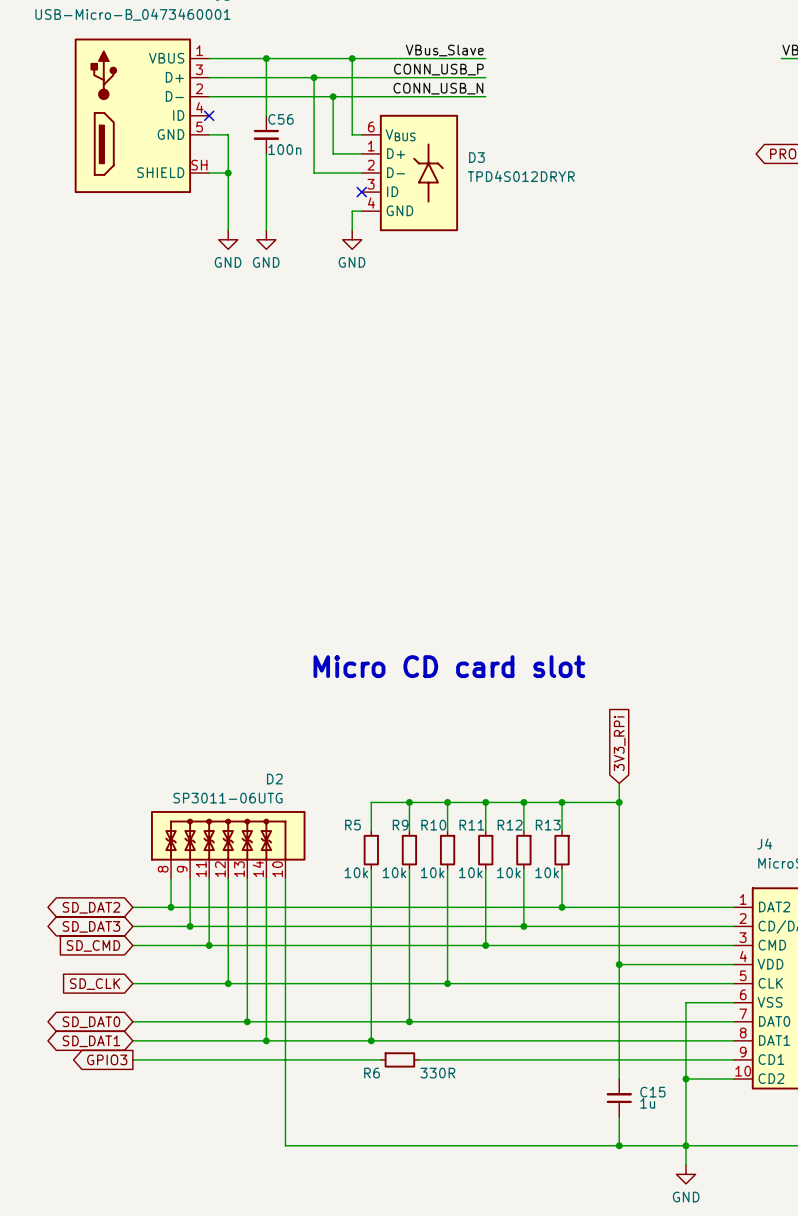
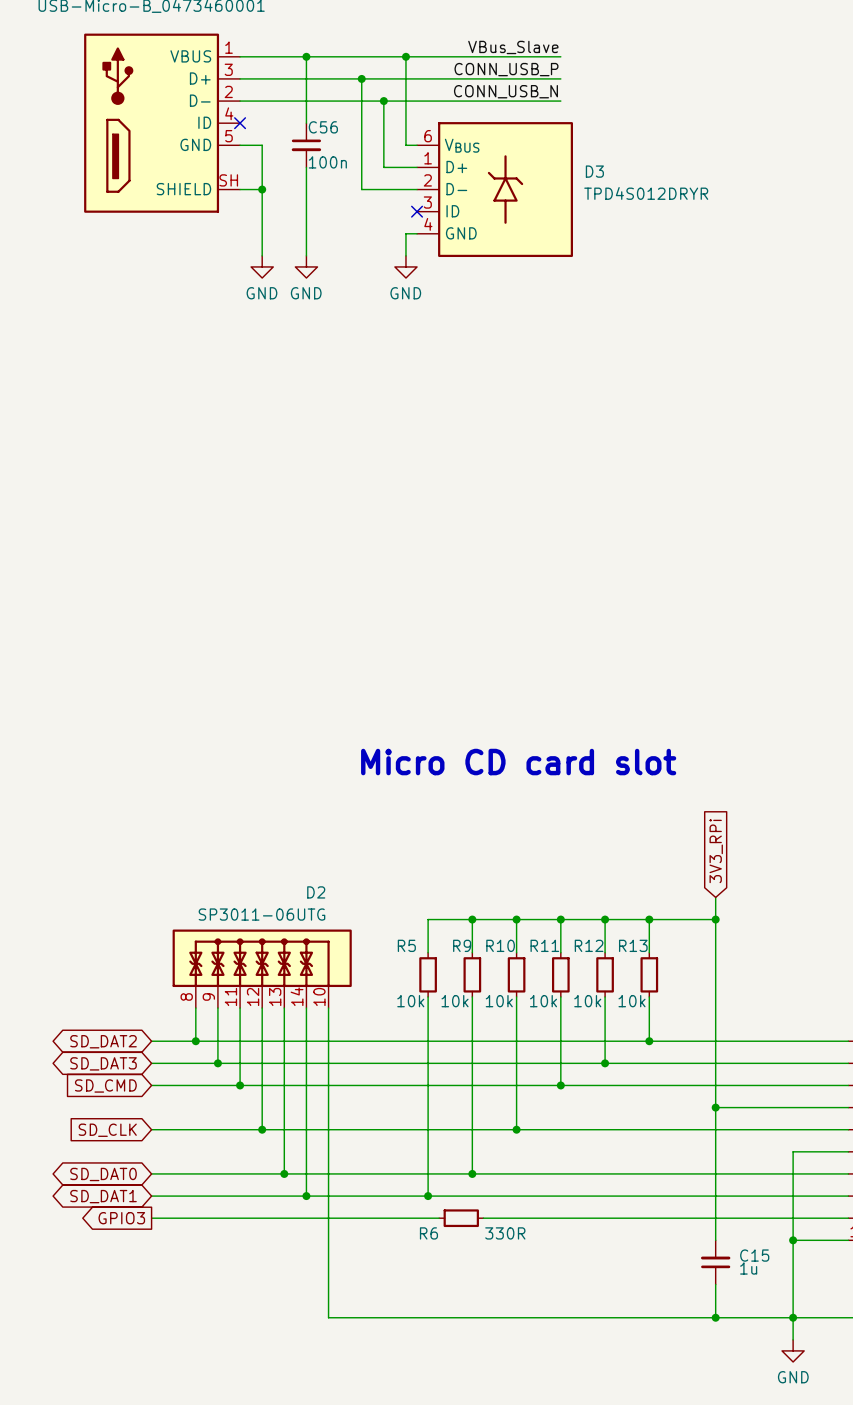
D3 symbol: [361, 114, 459, 232] -> [417, 122, 573, 258]
D3 name position: D3 (476, 157) -> D3 (594, 171)
D3 text position: TPD4S012DRYR (521, 176) -> TPD4S012DRYR (646, 193)

